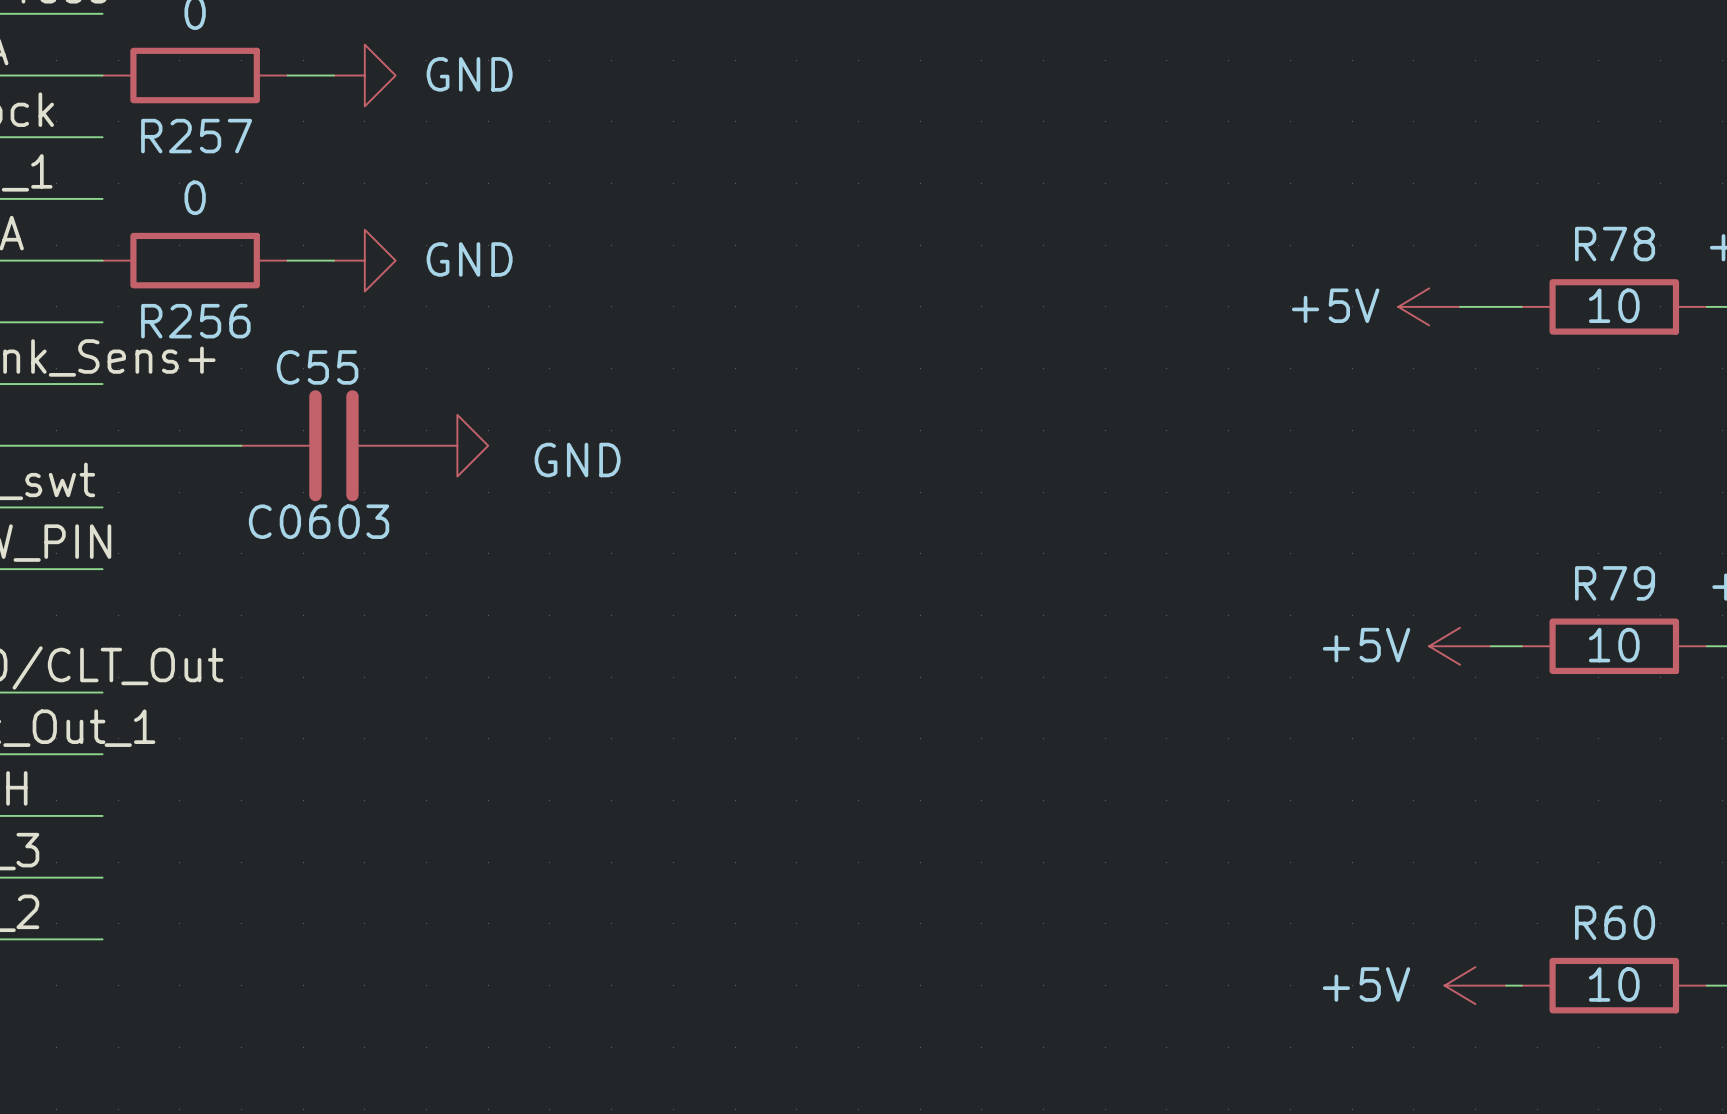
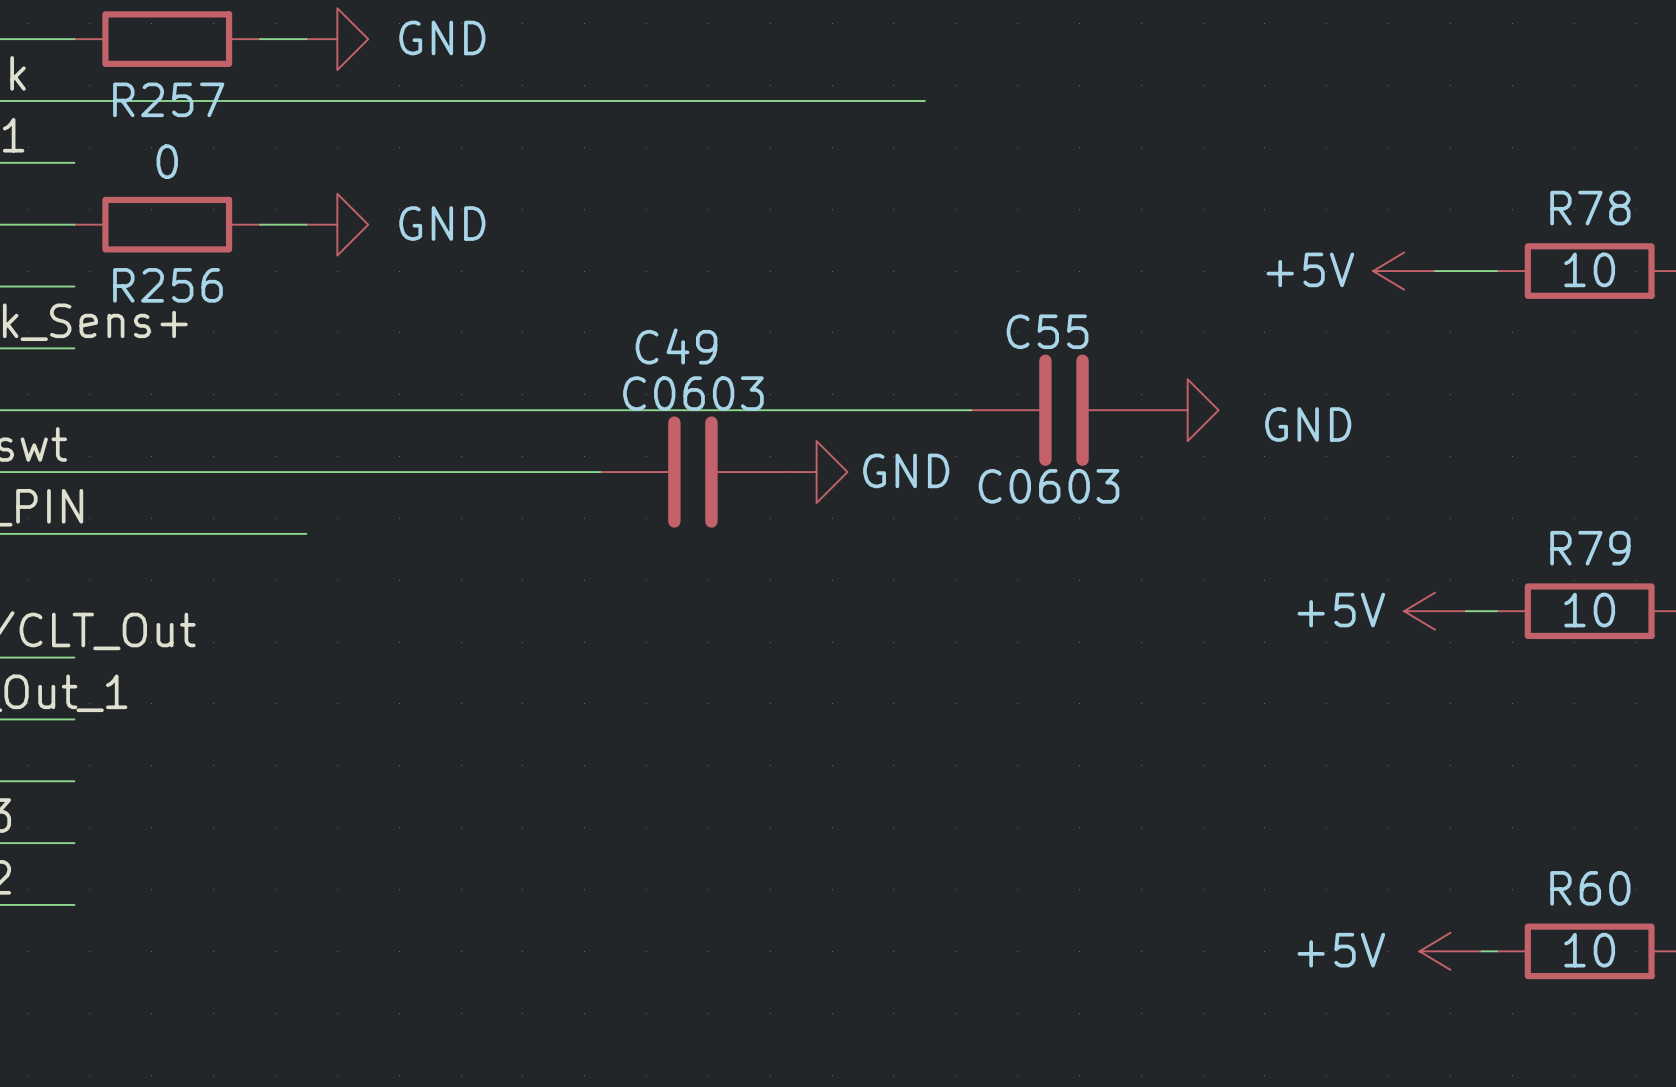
wire: none -> (74, 100) (924, 100)
wire: none -> (213, 410) (971, 410)
C55 position: (333, 445) -> (1063, 410)
power symbol: GND (457, 445) -> none
power symbol: none -> GND (1187, 410)
wire: none -> (74, 472) (600, 472)
C49: none -> C0603 (692, 472)
power symbol: none -> GND (816, 472)
wire: none -> (74, 533) (306, 533)

